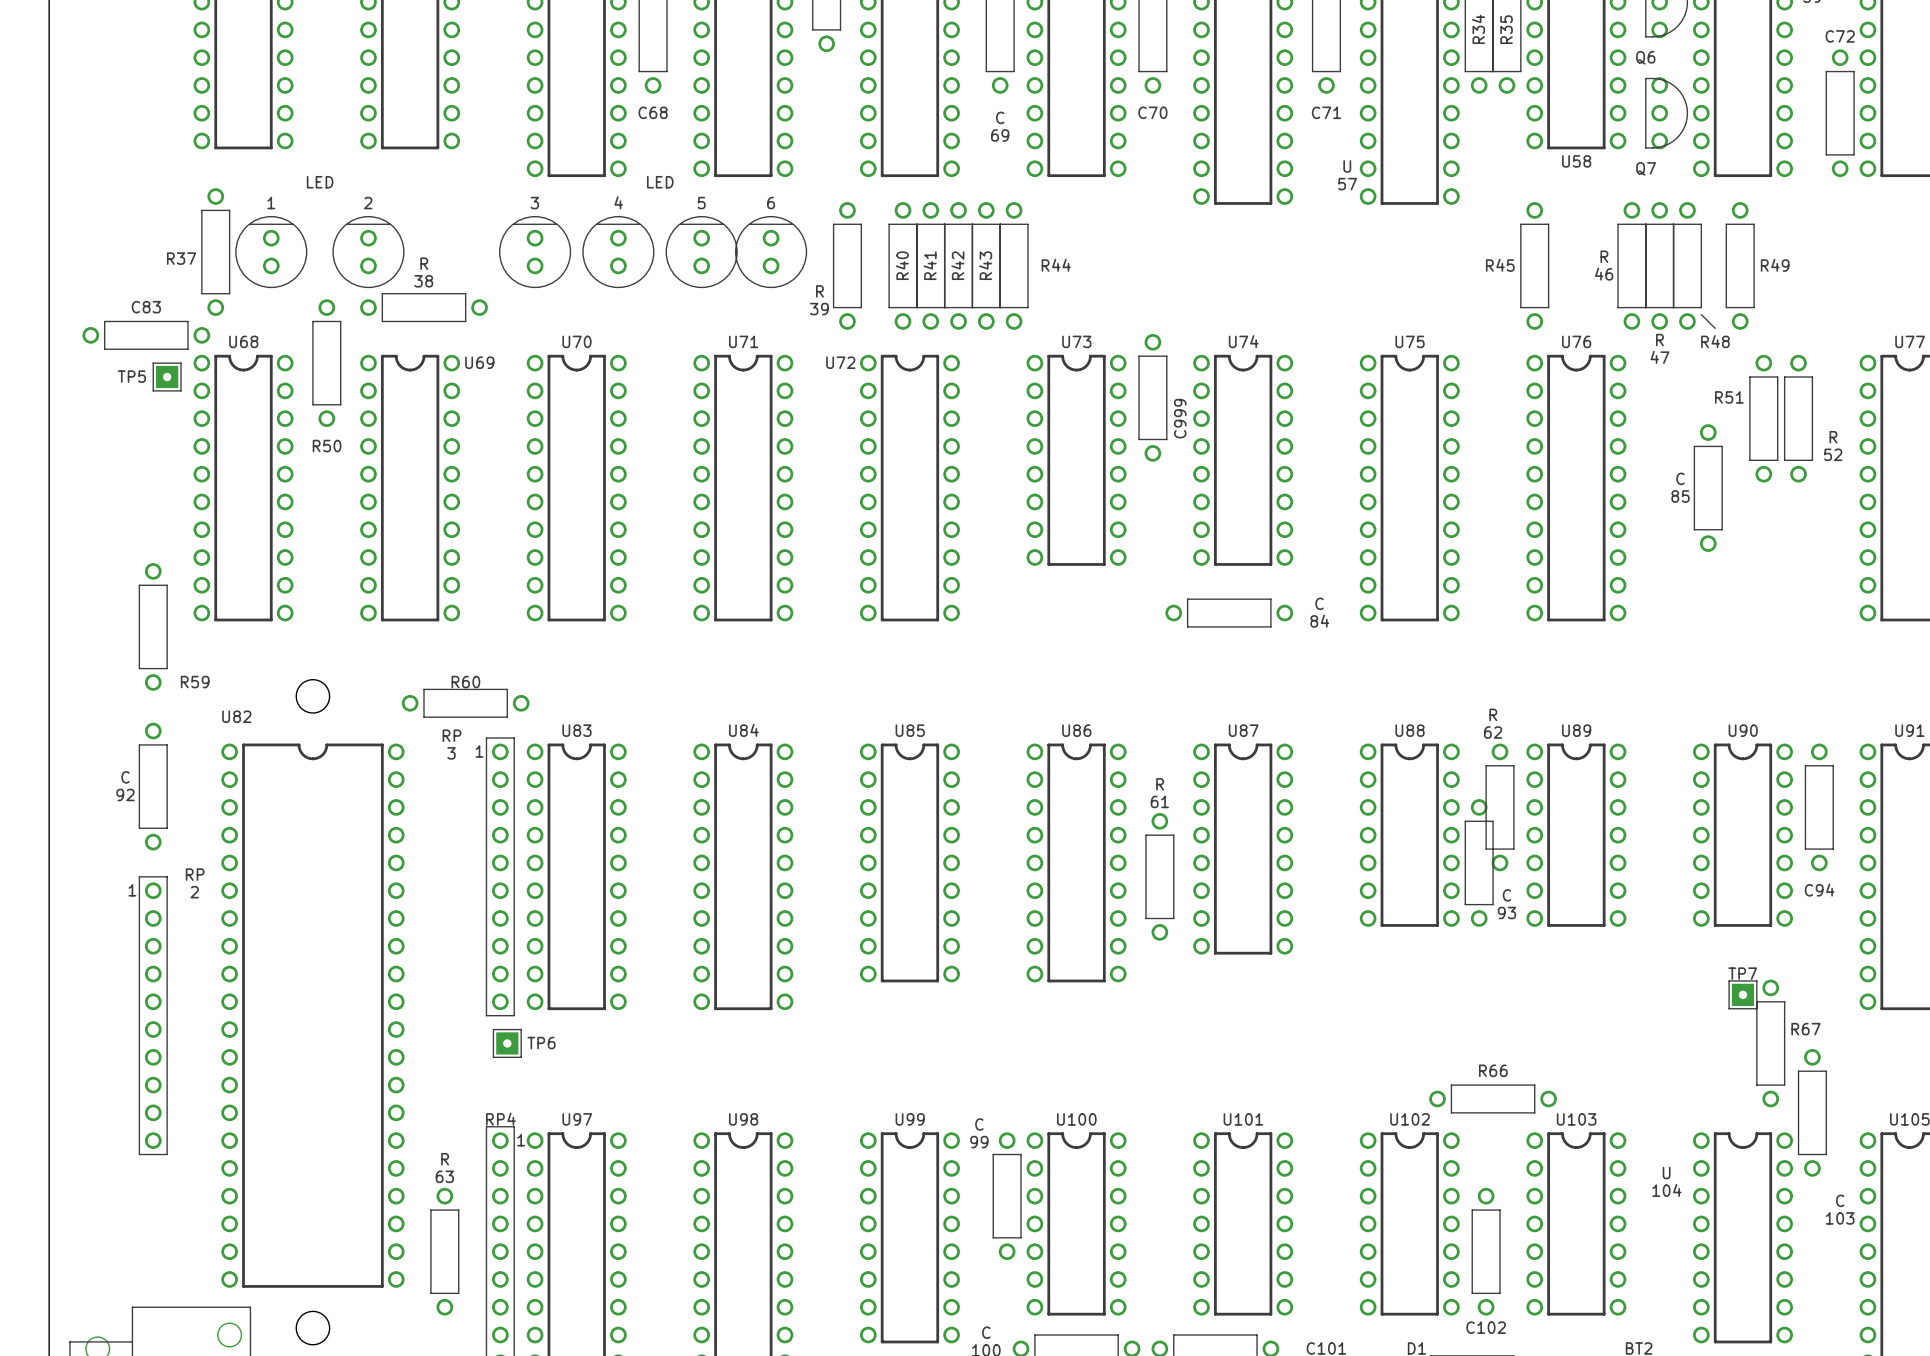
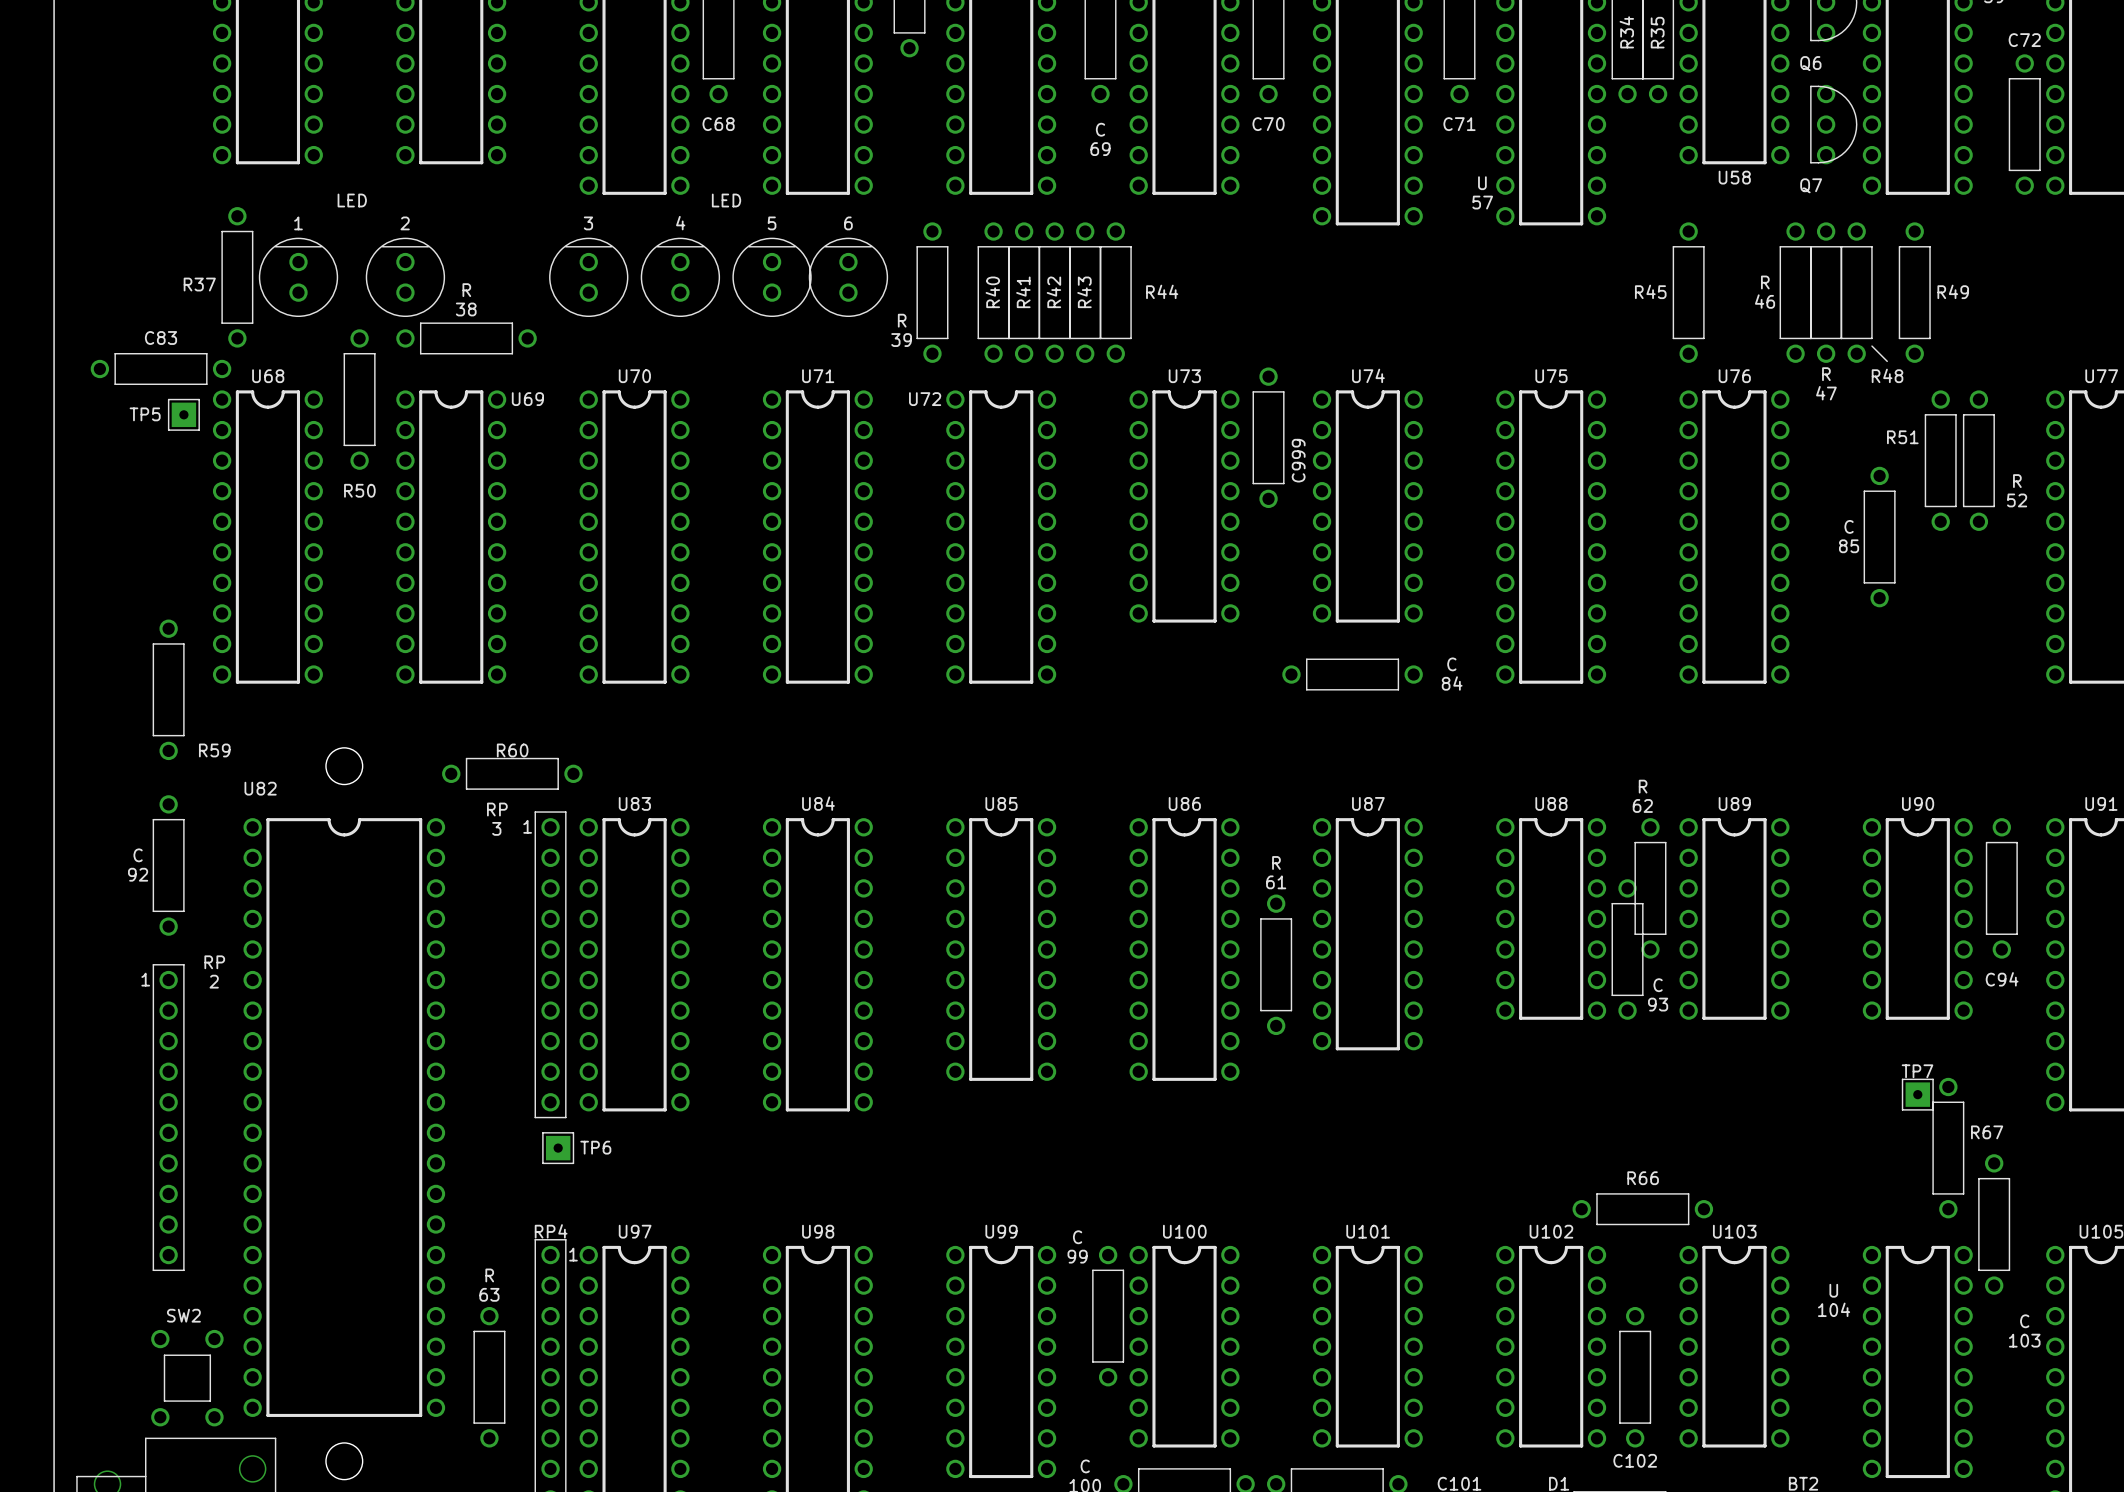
SW2: none -> (187, 1378)

